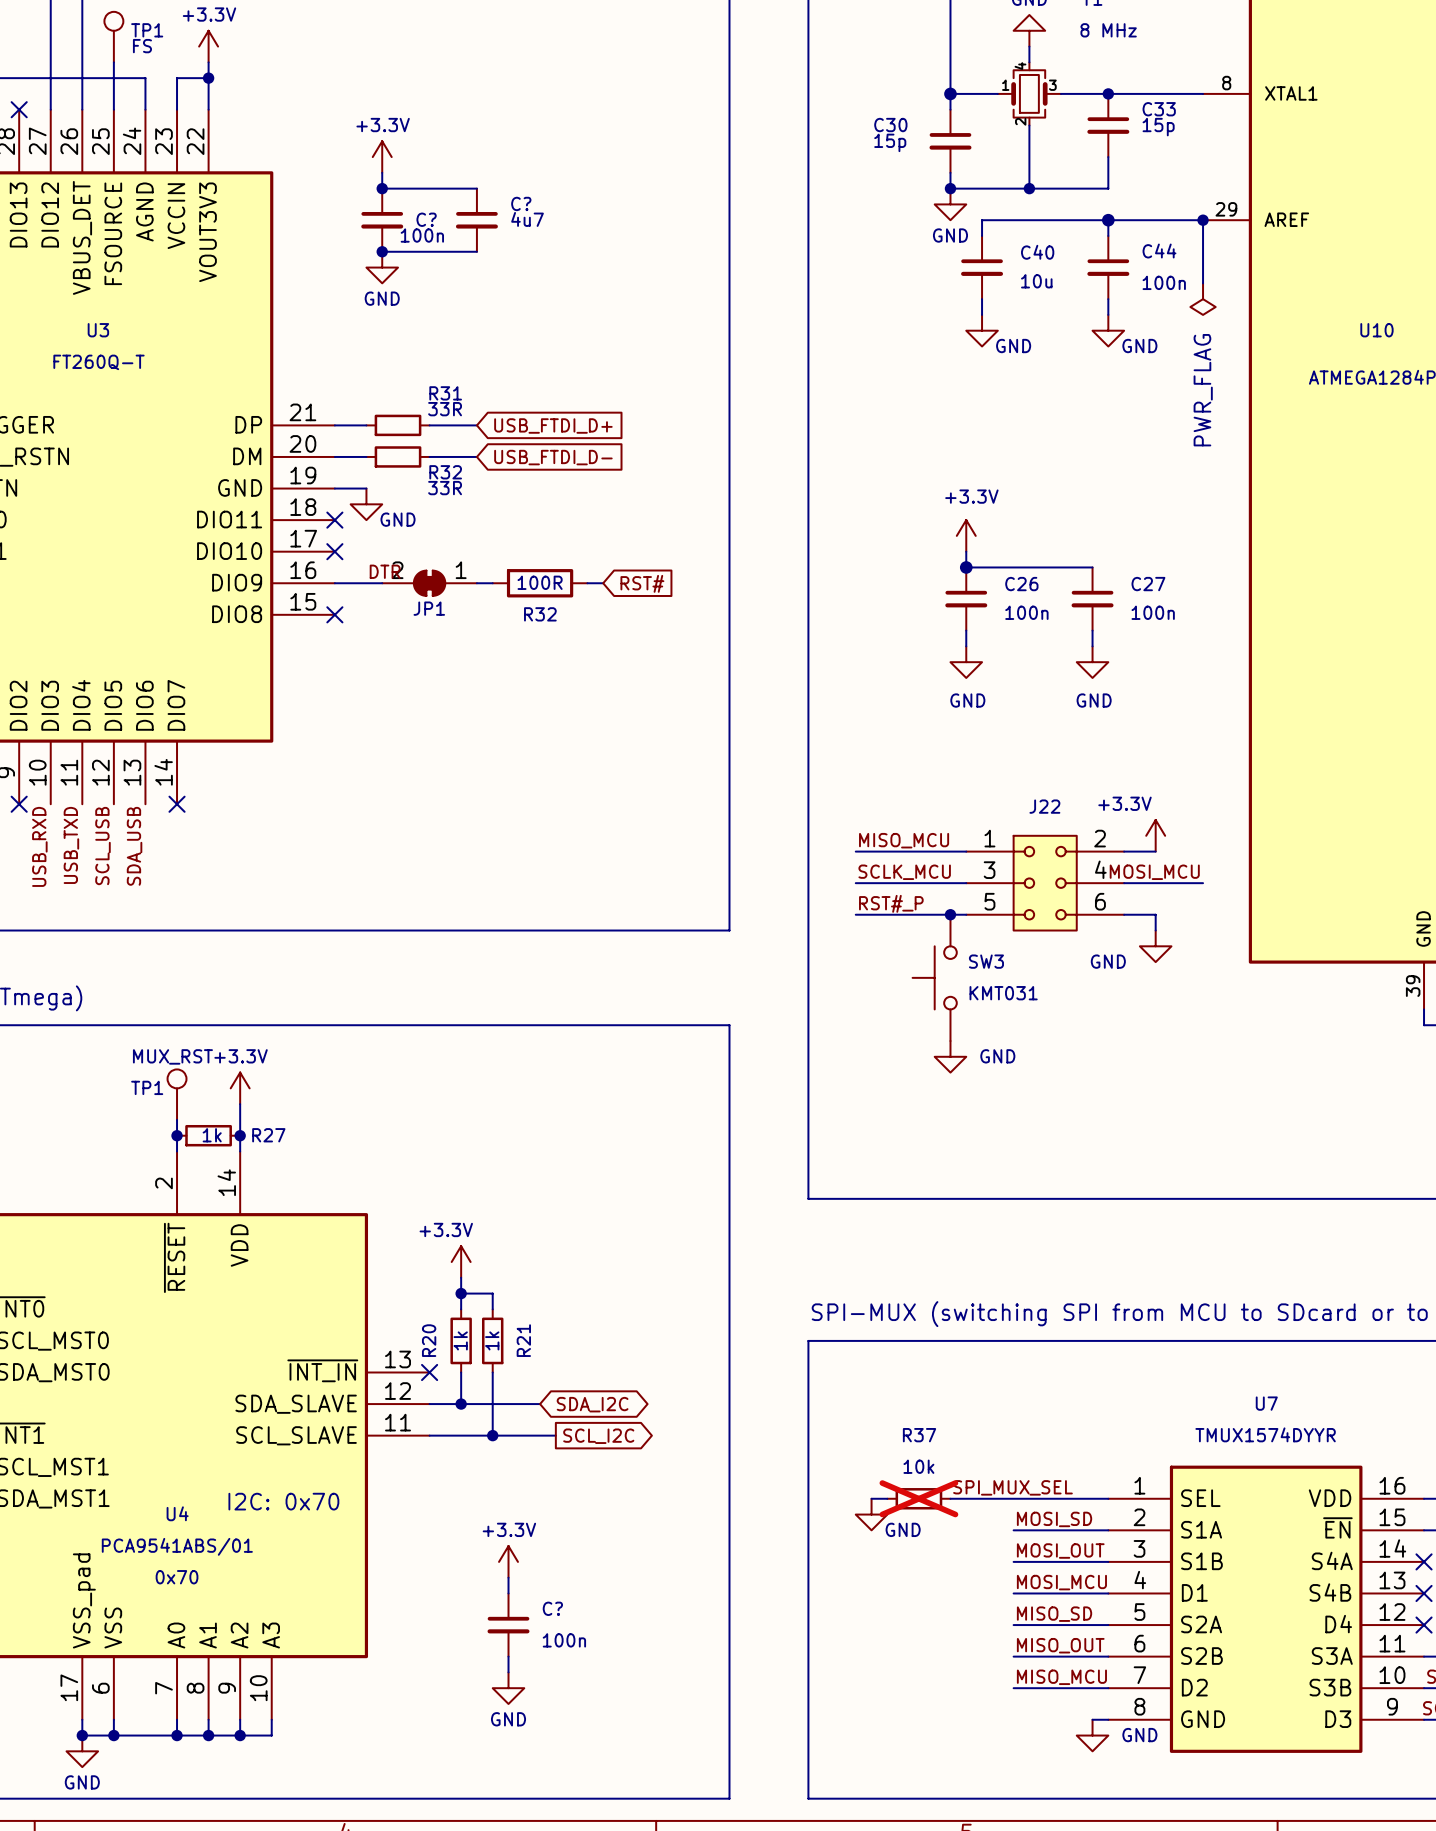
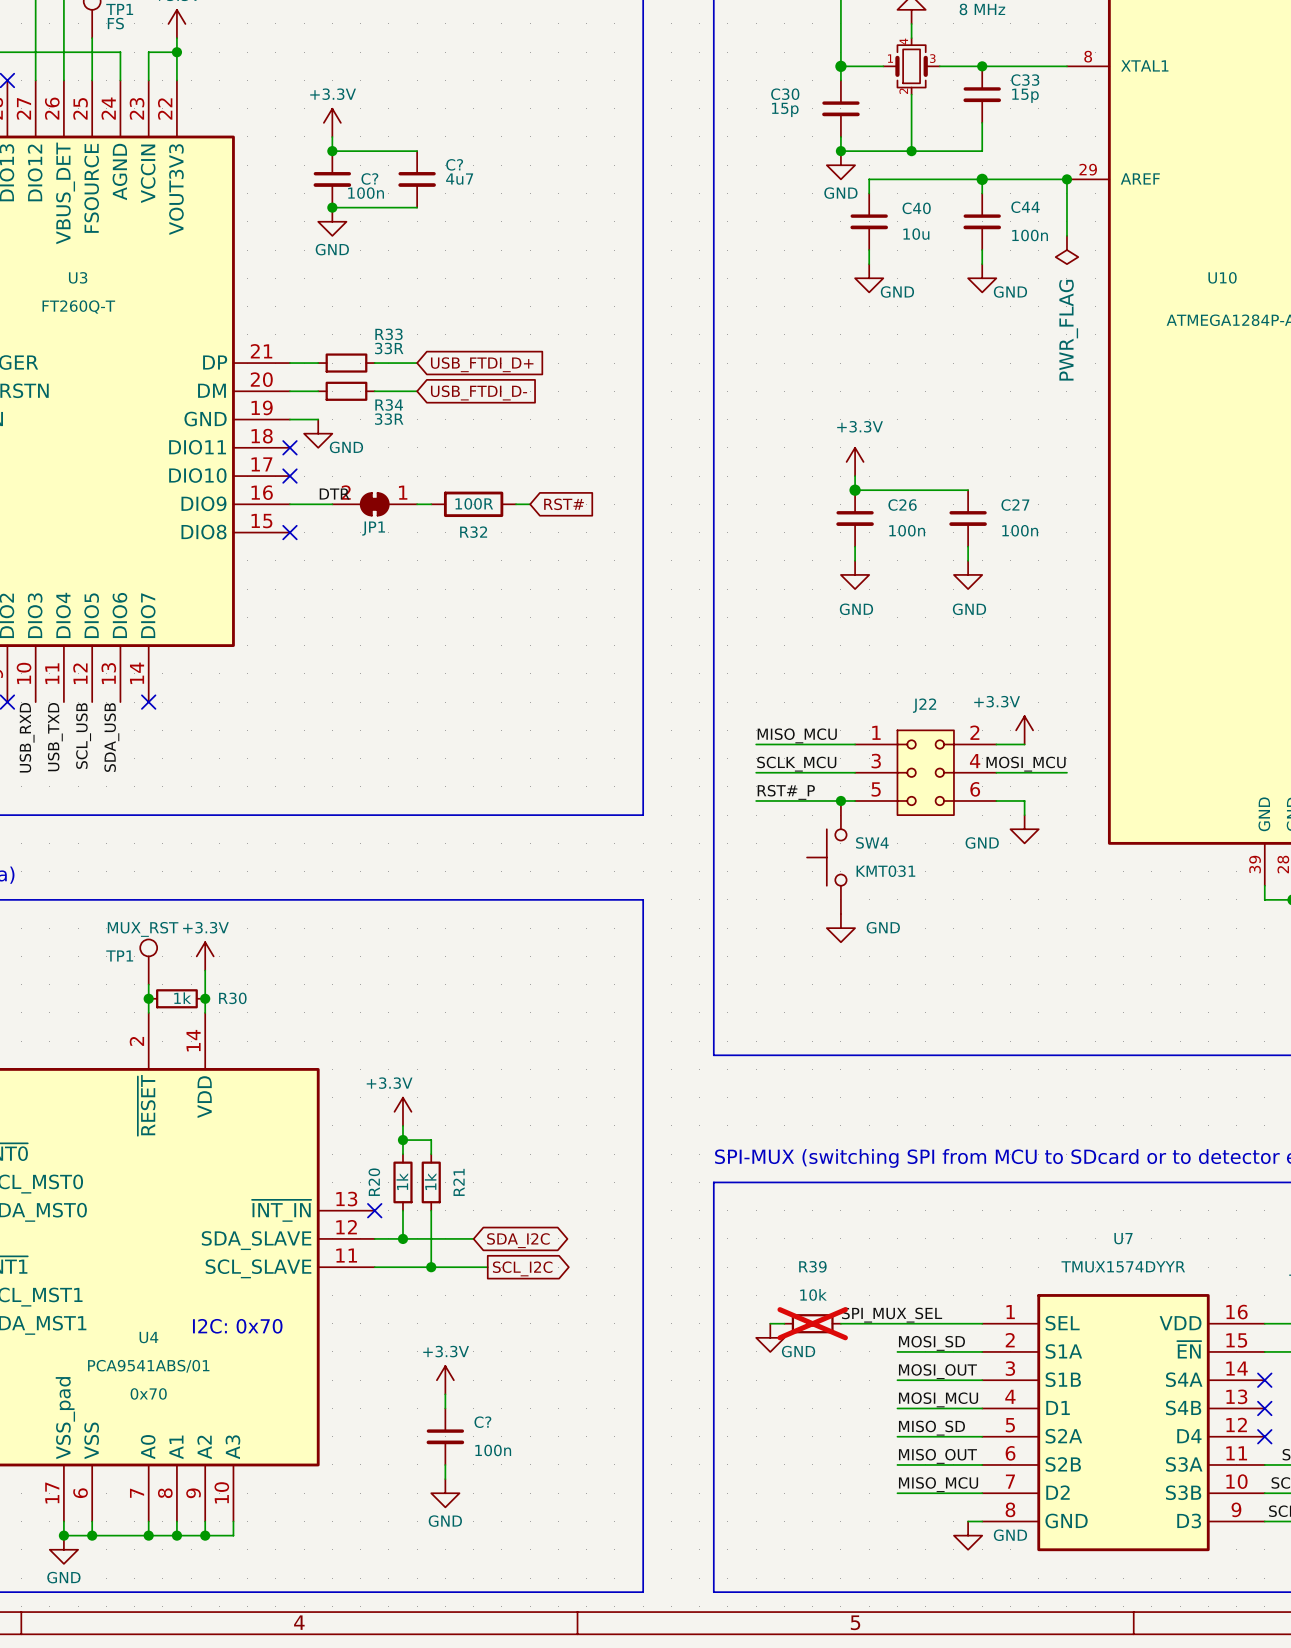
R31 name: R31 (445, 393) -> R33 (389, 334)
R32 name: R32 (445, 472) -> R34 (389, 405)
SW3 name: SW3 (986, 961) -> SW4 (872, 842)
R27 name: R27 (268, 1135) -> R30 (232, 998)
R37 name: R37 (919, 1435) -> R39 (812, 1266)

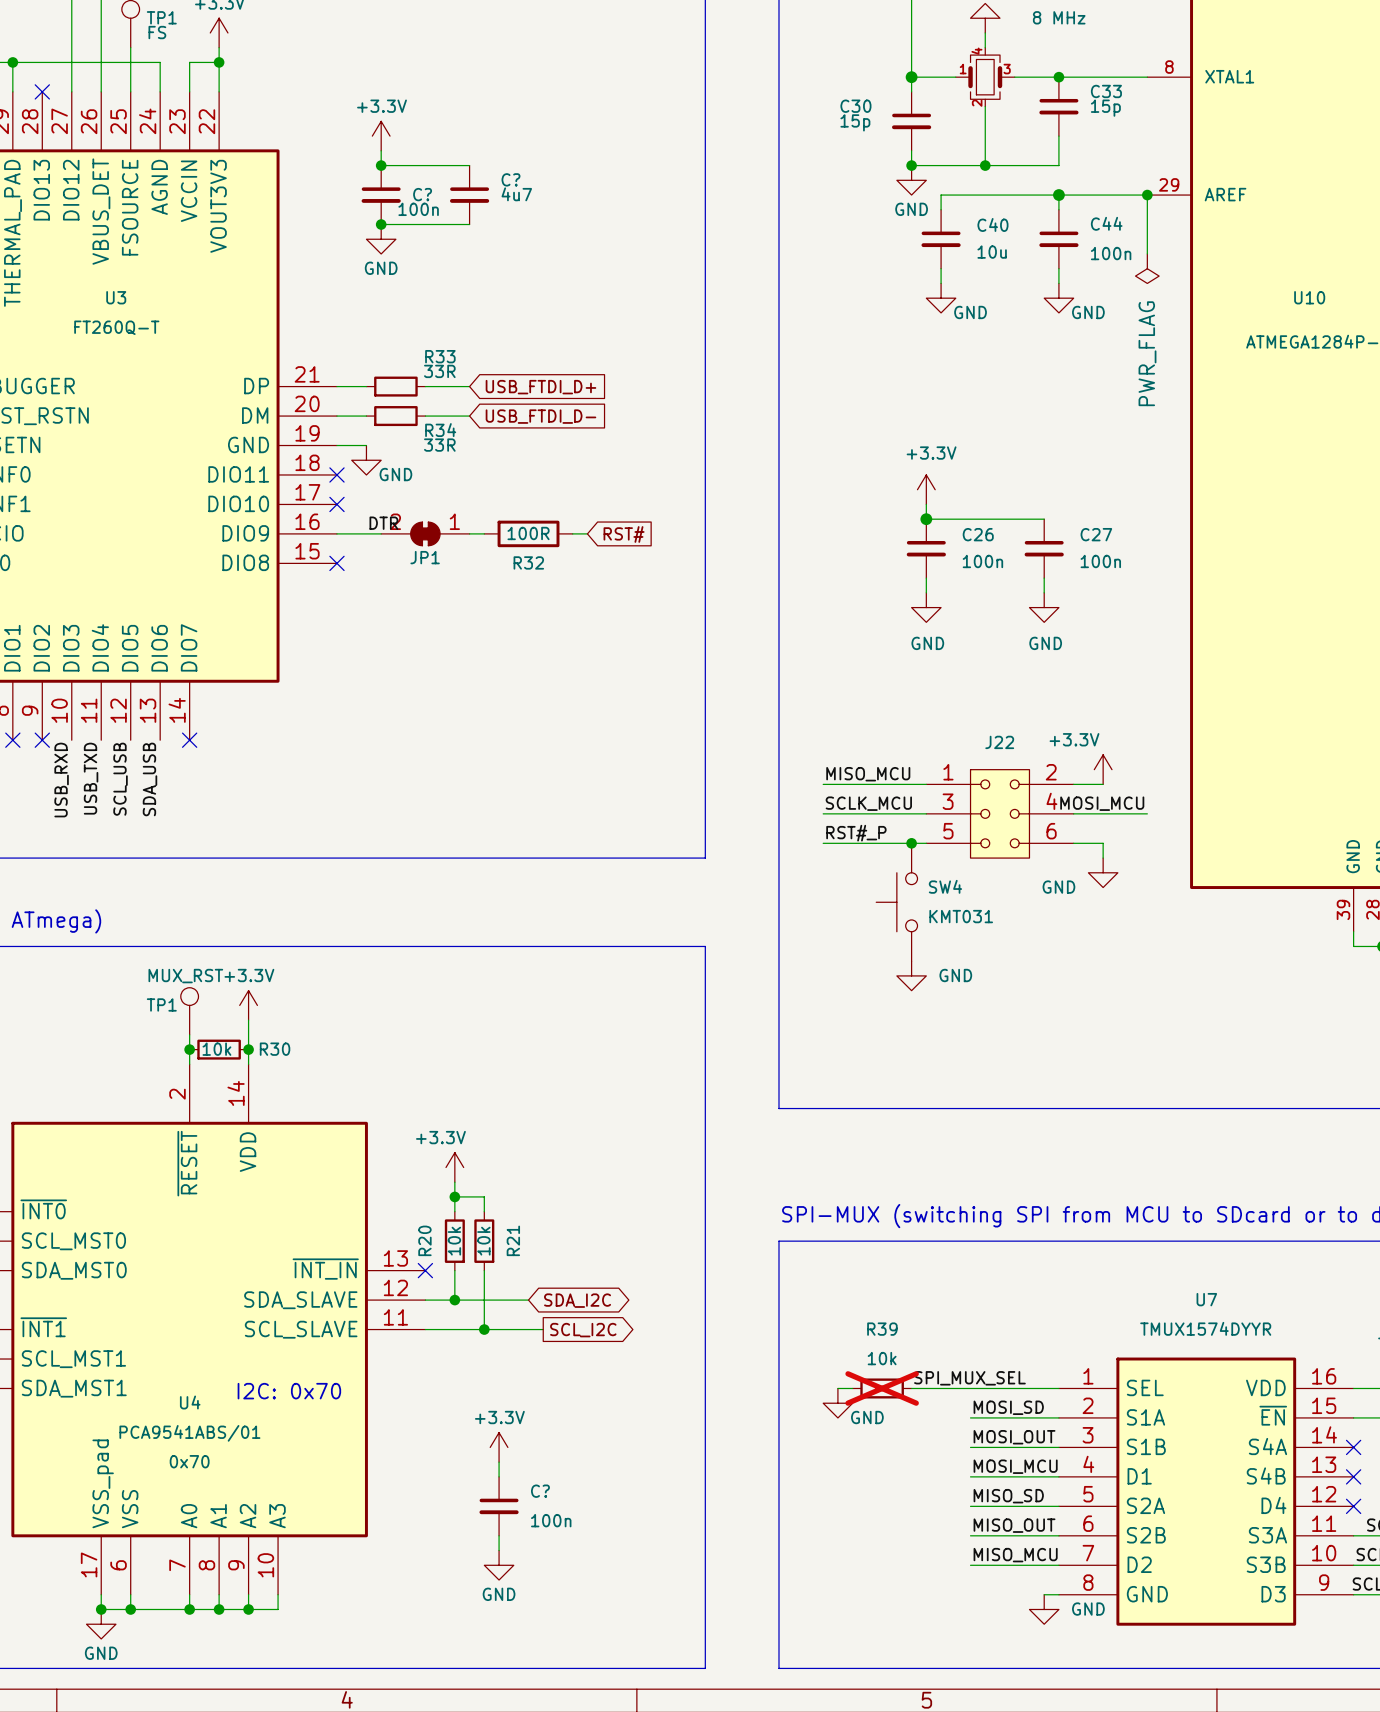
R30 value: 1k (182, 998) -> 10k (216, 1049)
R20 value: 1k (402, 1181) -> 10k (454, 1241)
R21 value: 1k (430, 1181) -> 10k (483, 1241)

